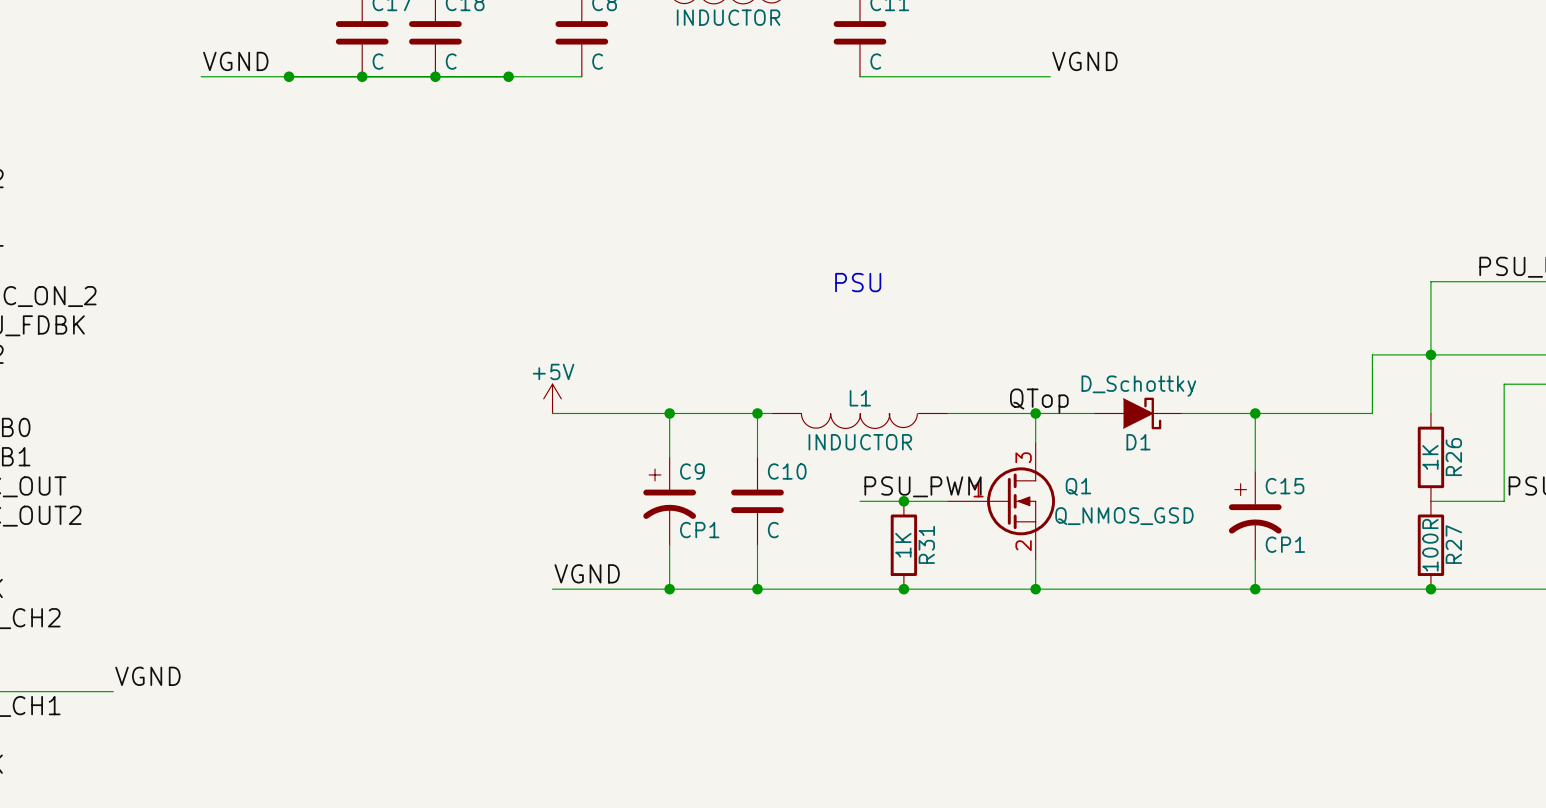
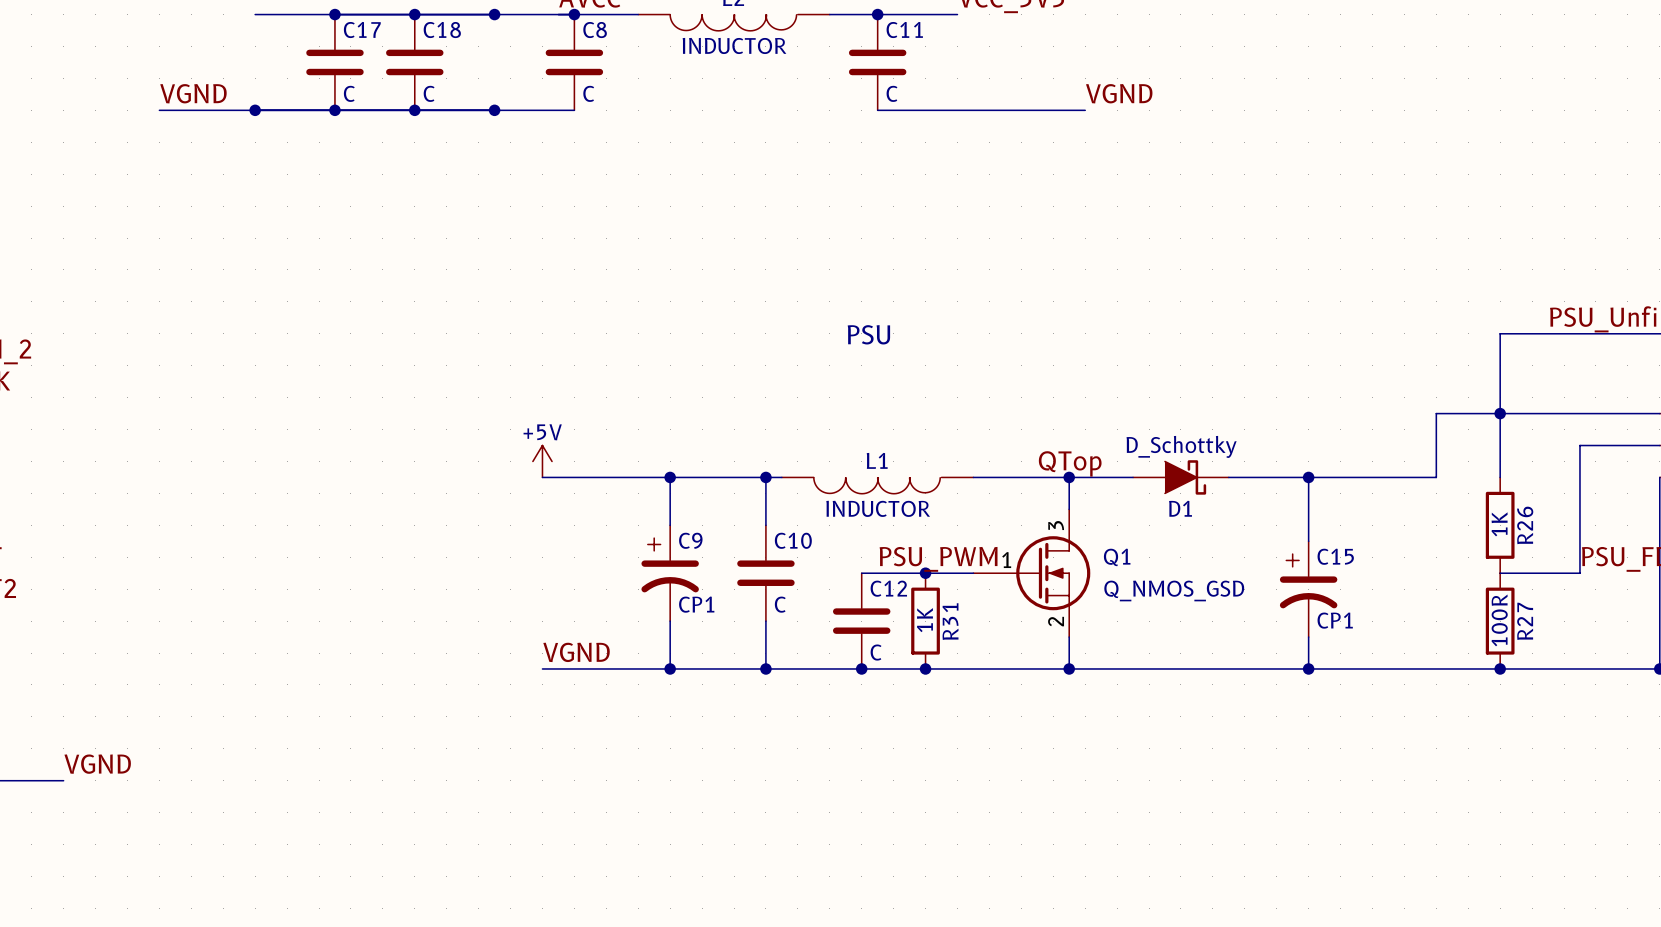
wire: none -> (861, 573) (877, 573)
C12: none -> C (861, 621)
junction: none -> (861, 668)

